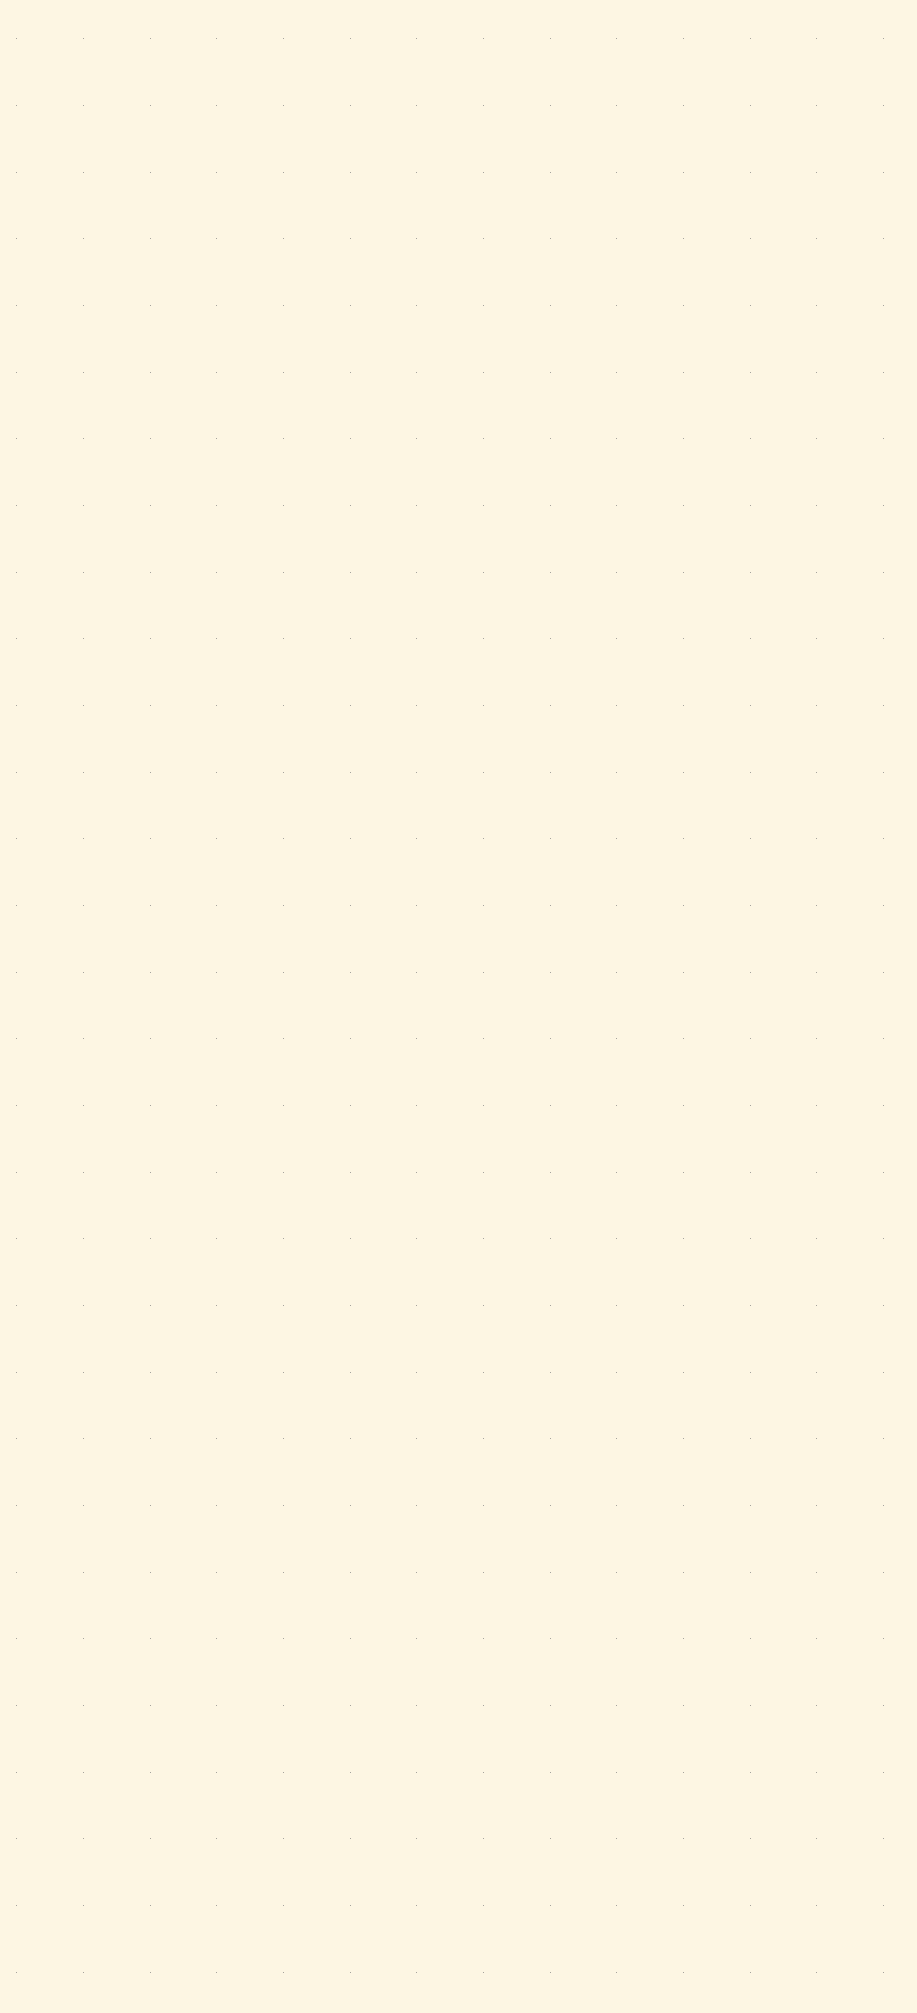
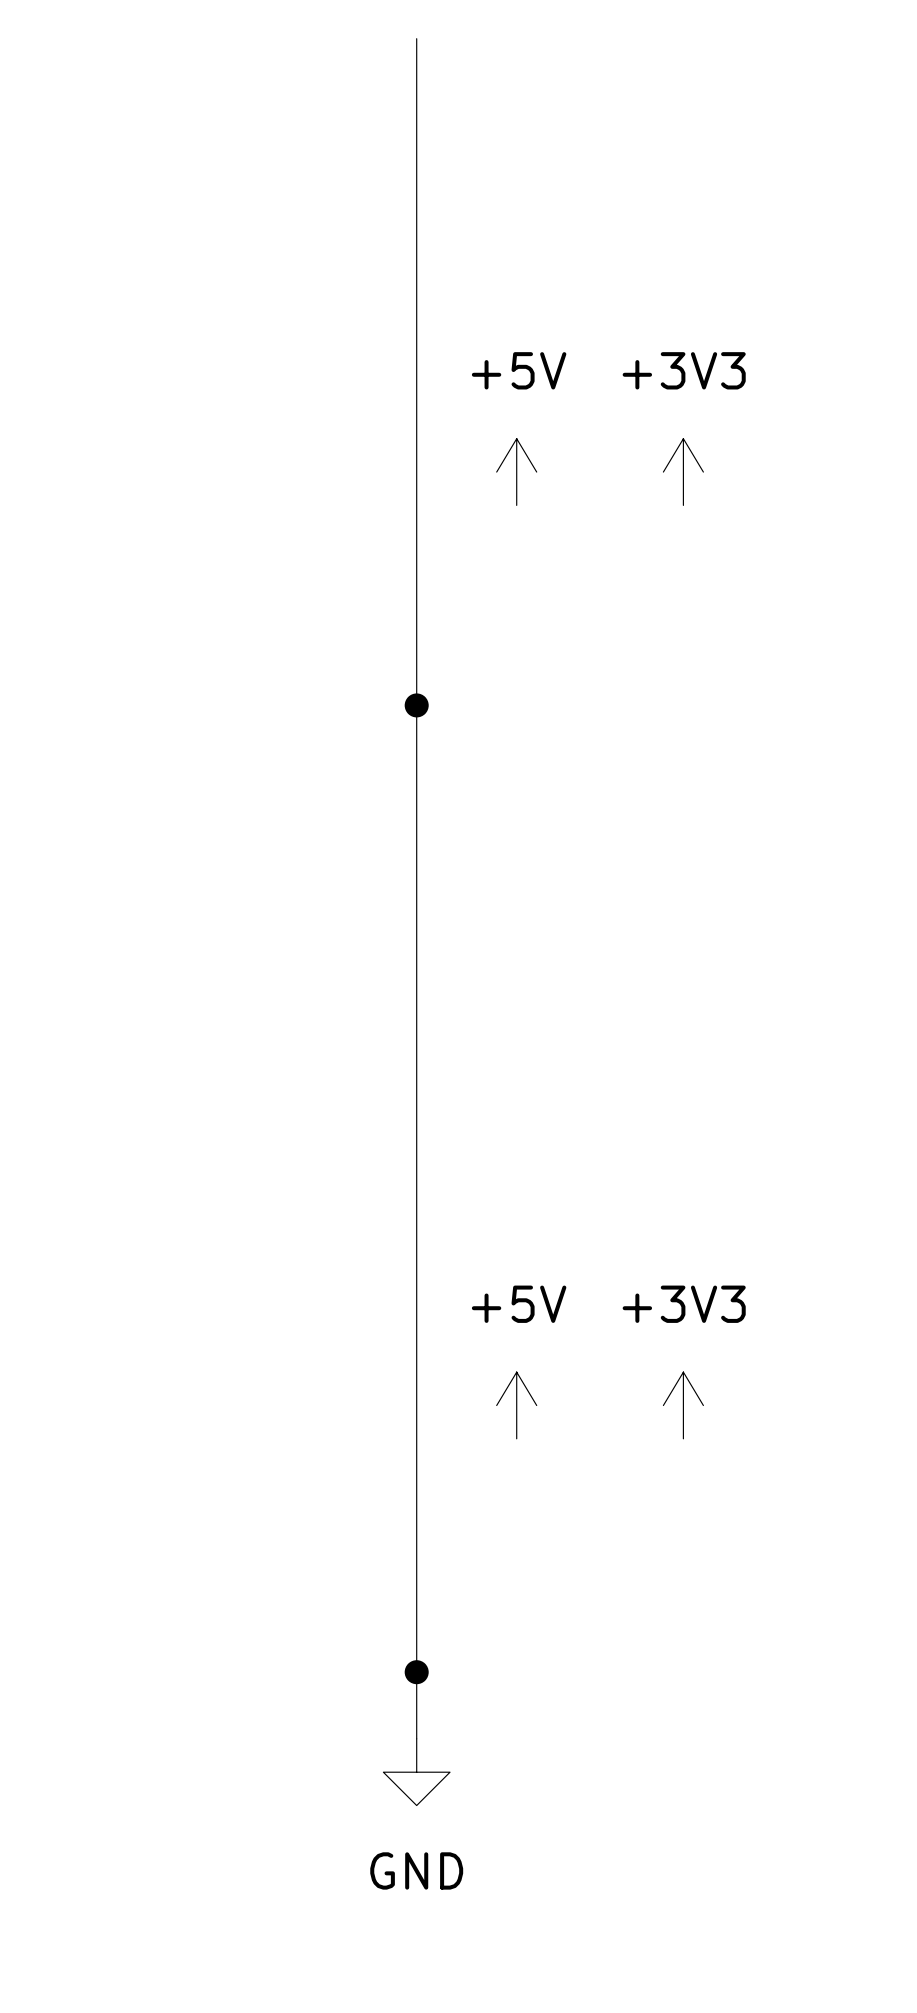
wire: none -> (416, 38) (416, 1738)
power symbol: none -> +5V (516, 472)
power symbol: none -> +3V3 (683, 472)
junction: none -> (416, 705)
power symbol: none -> +5V (516, 1405)
power symbol: none -> +3V3 (683, 1405)
junction: none -> (416, 1672)
power symbol: none -> GND (416, 1772)

